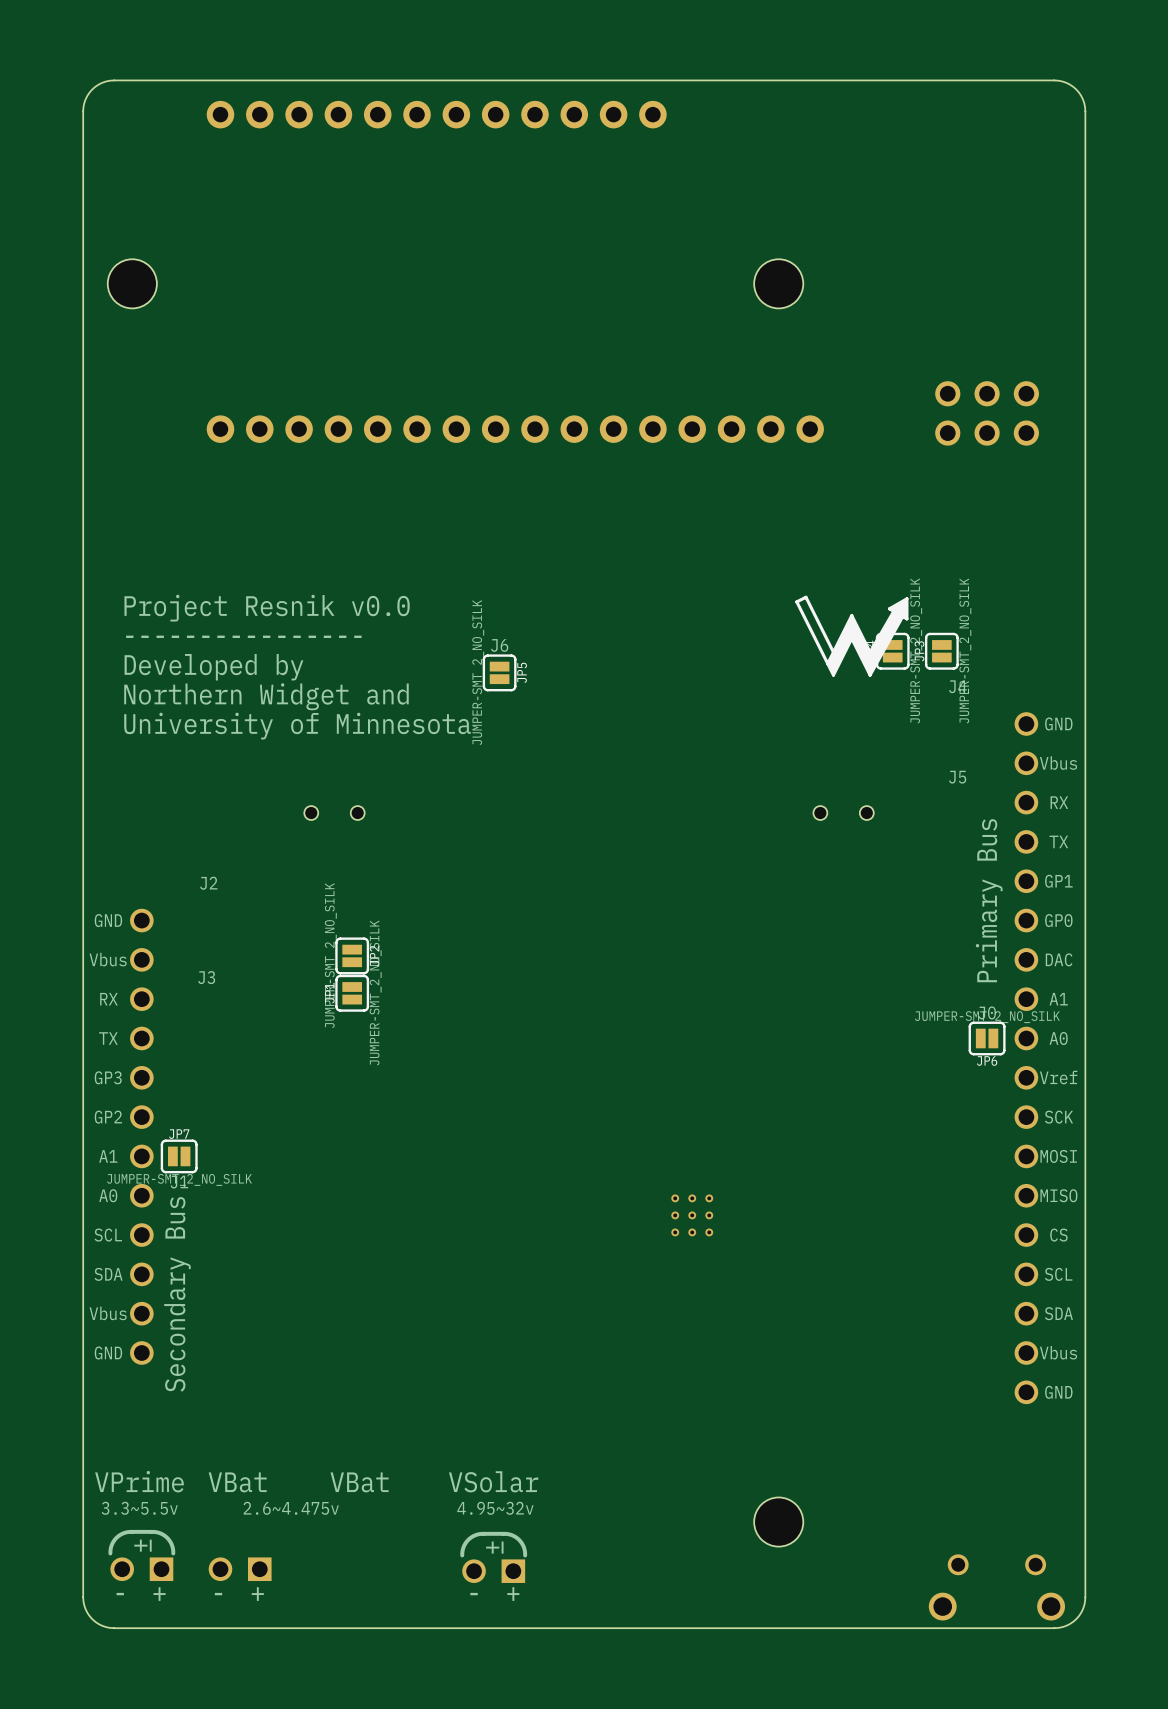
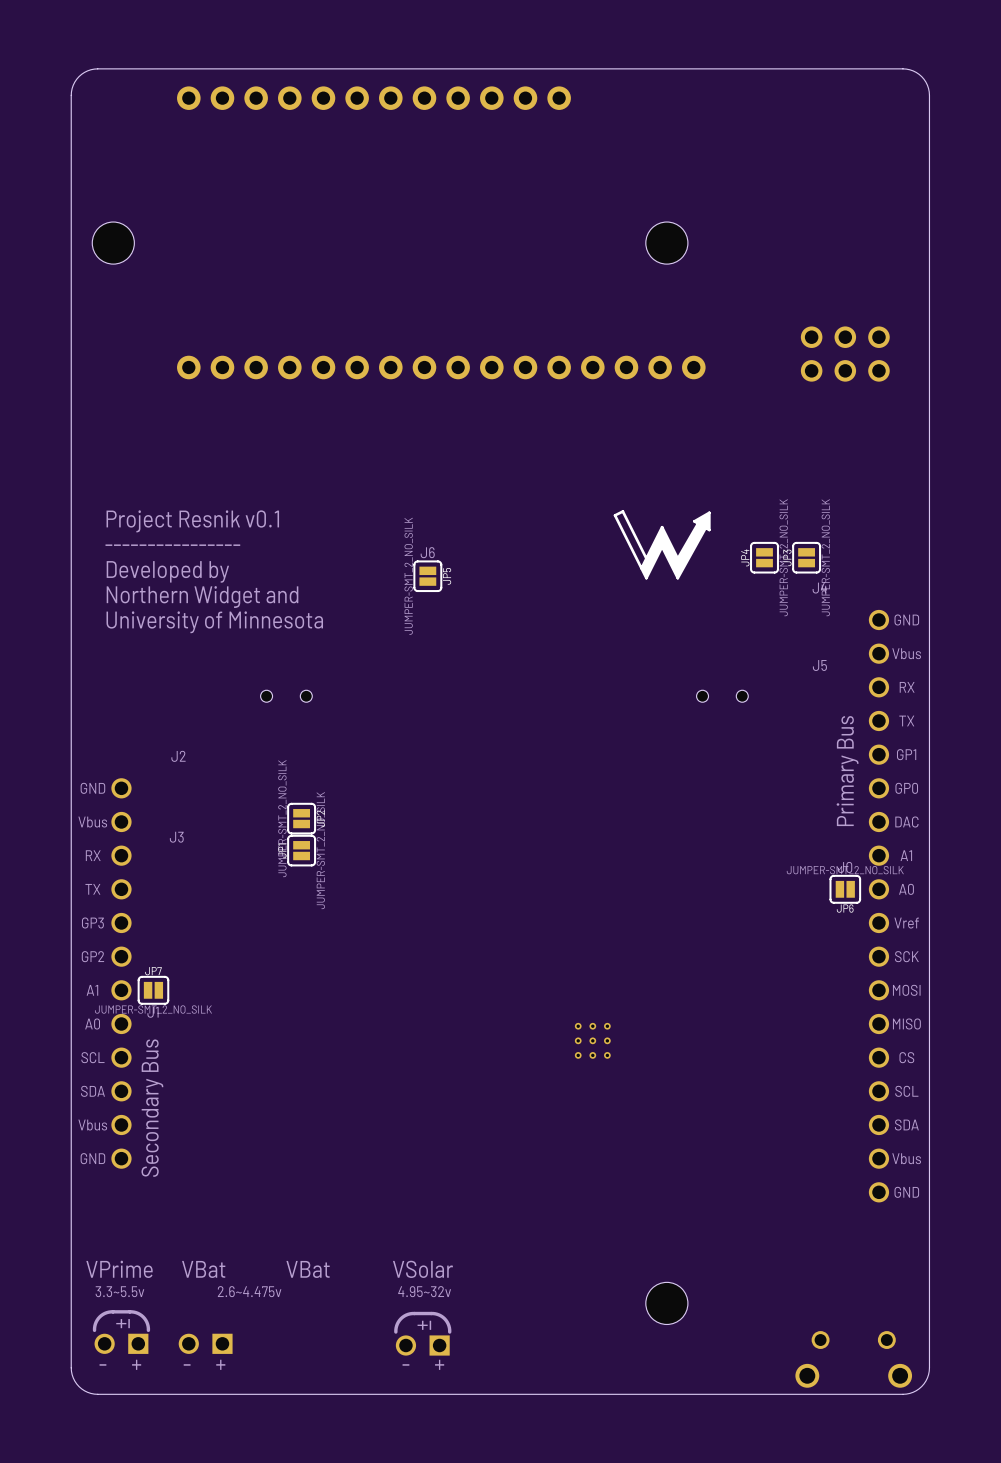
text: Project Resnik v0.0 (267, 608) -> Project Resnik v0.1 (192, 521)
drawing position: (851, 636) -> (662, 544)

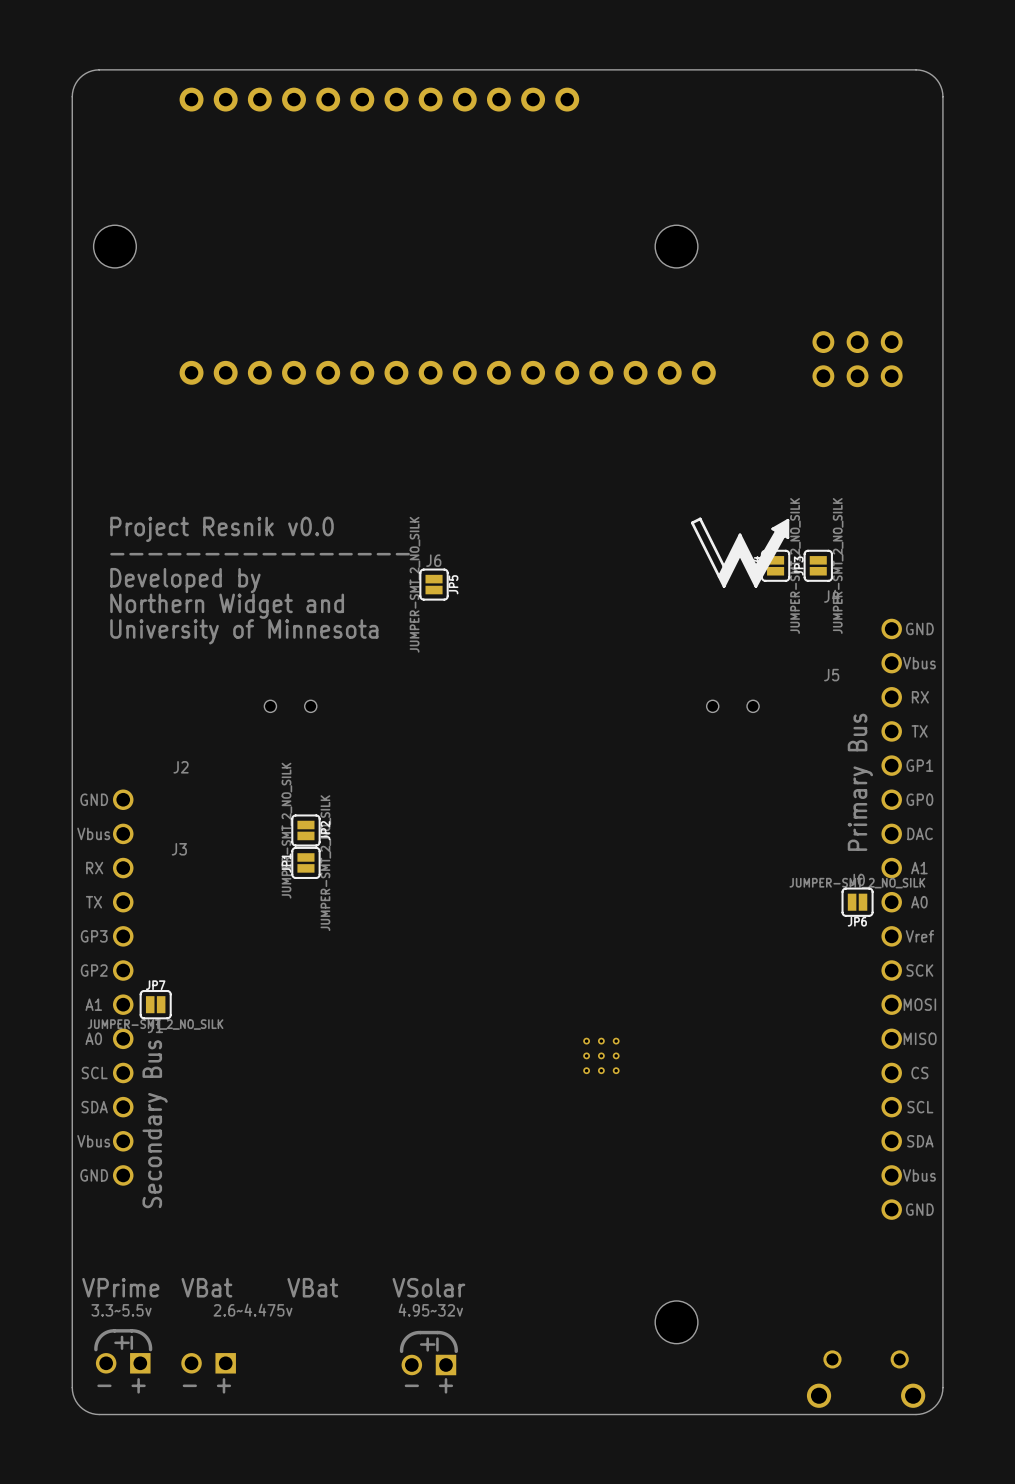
text: Project Resnik v0.1 (192, 521) -> Project Resnik v0.0 (222, 529)
drawing position: (662, 544) -> (740, 552)

